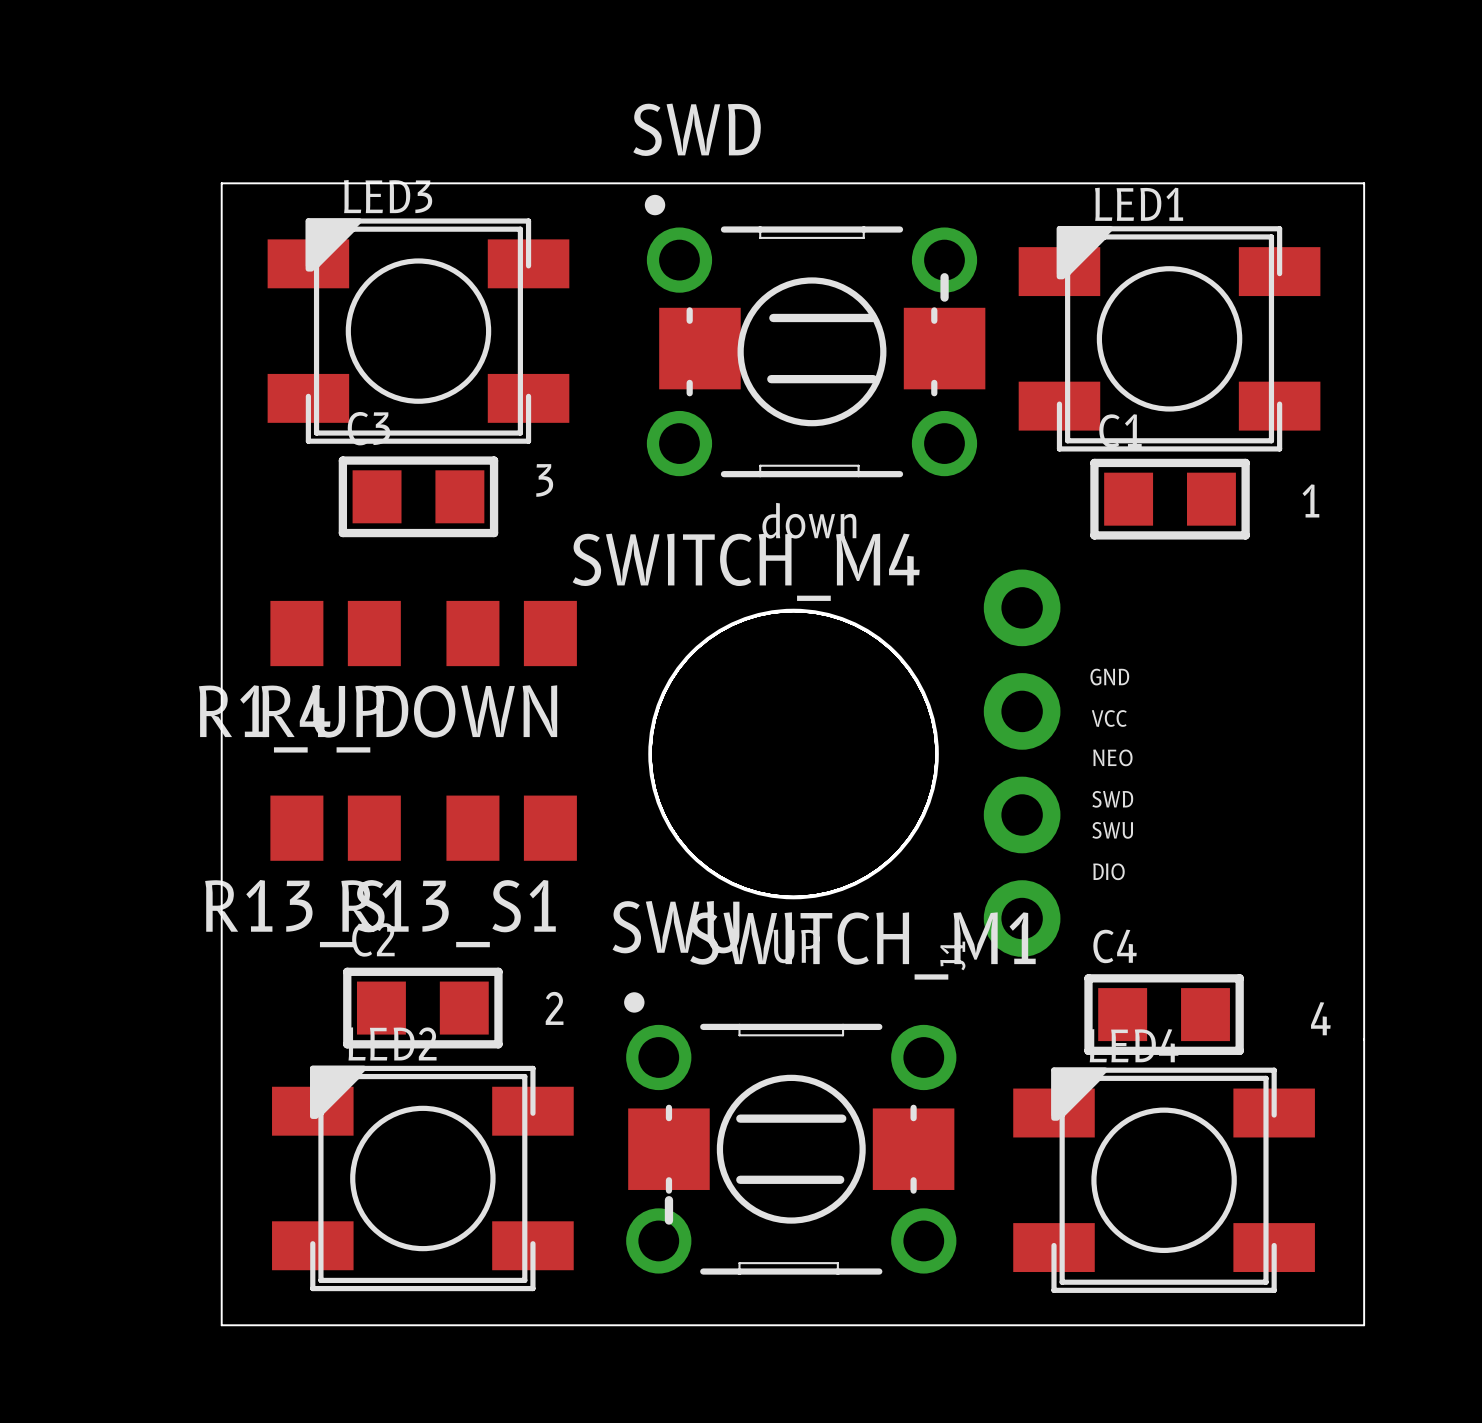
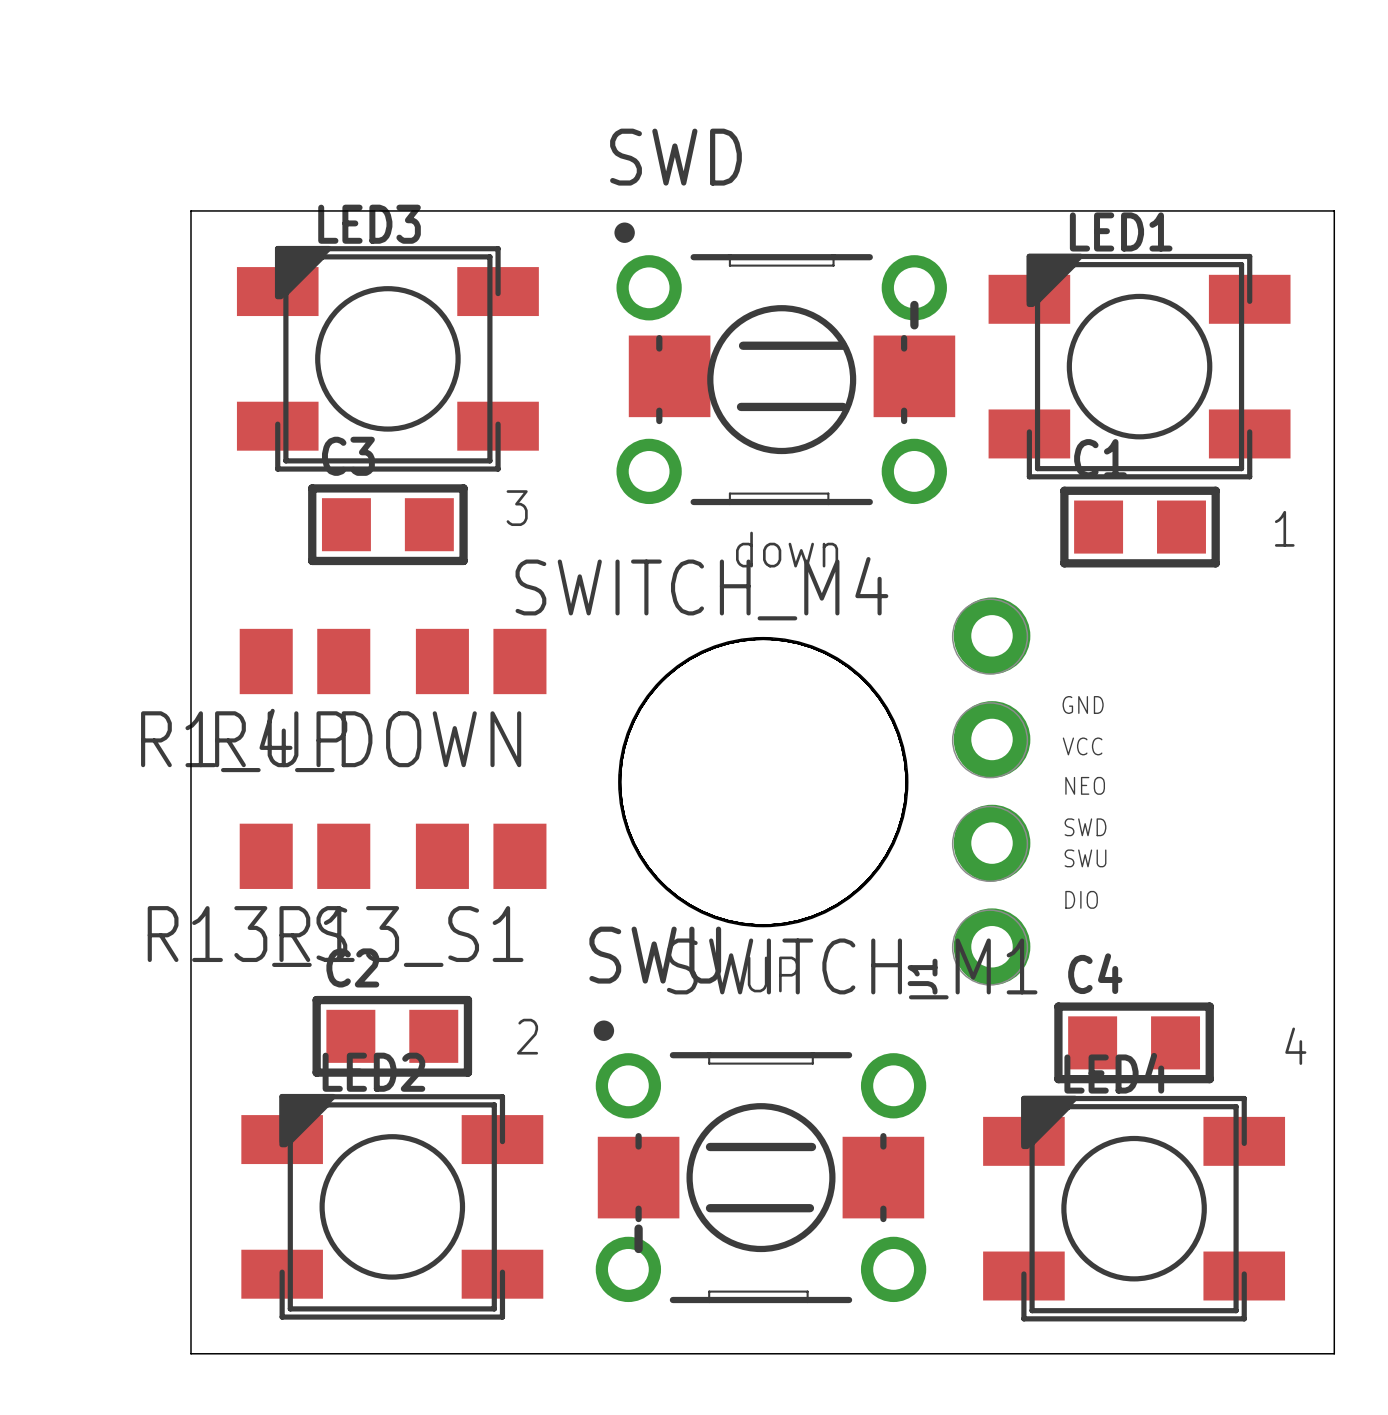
drawing: none -> [952, 599, 1028, 985]

